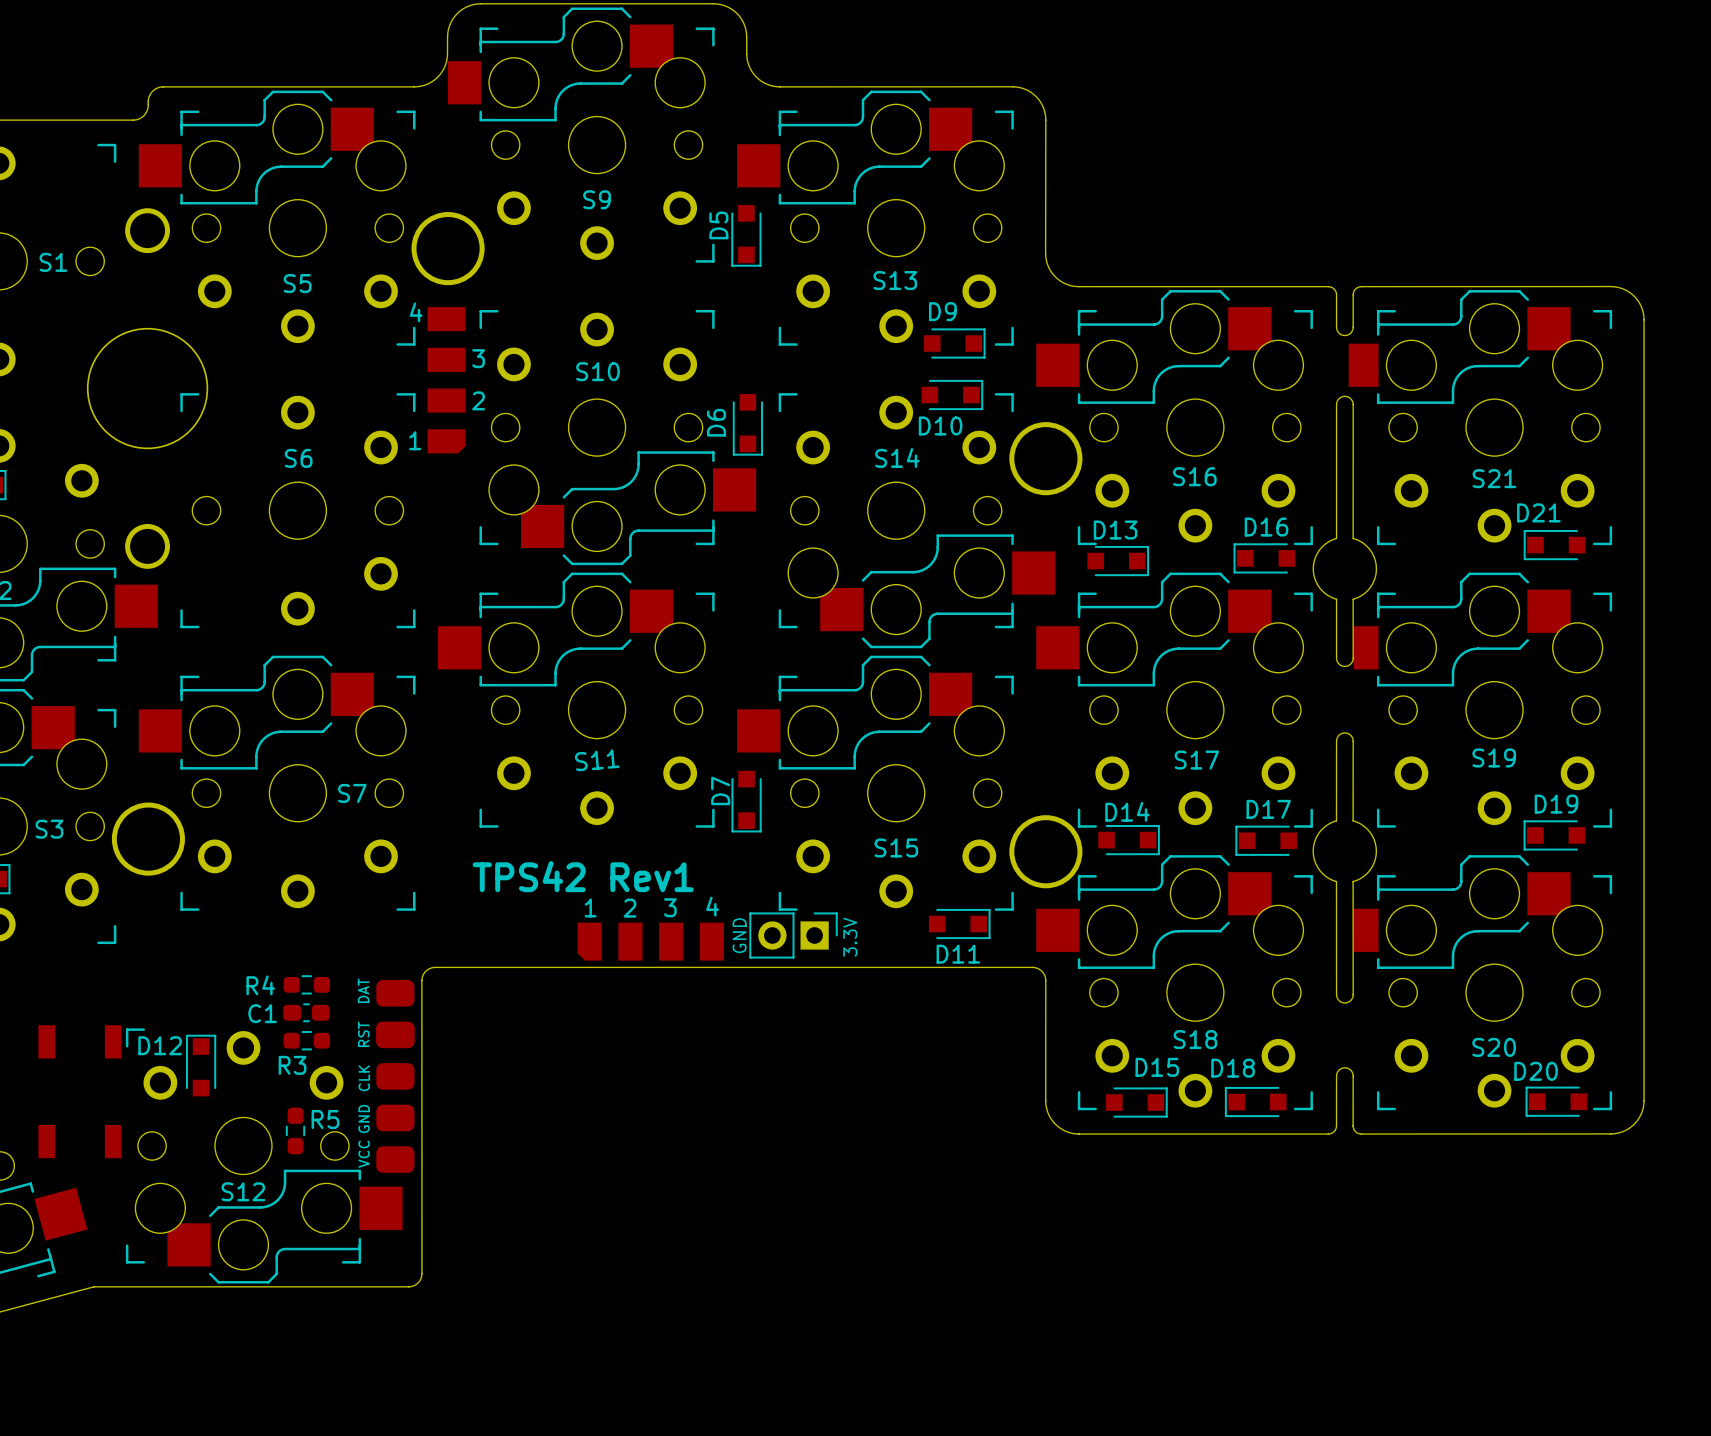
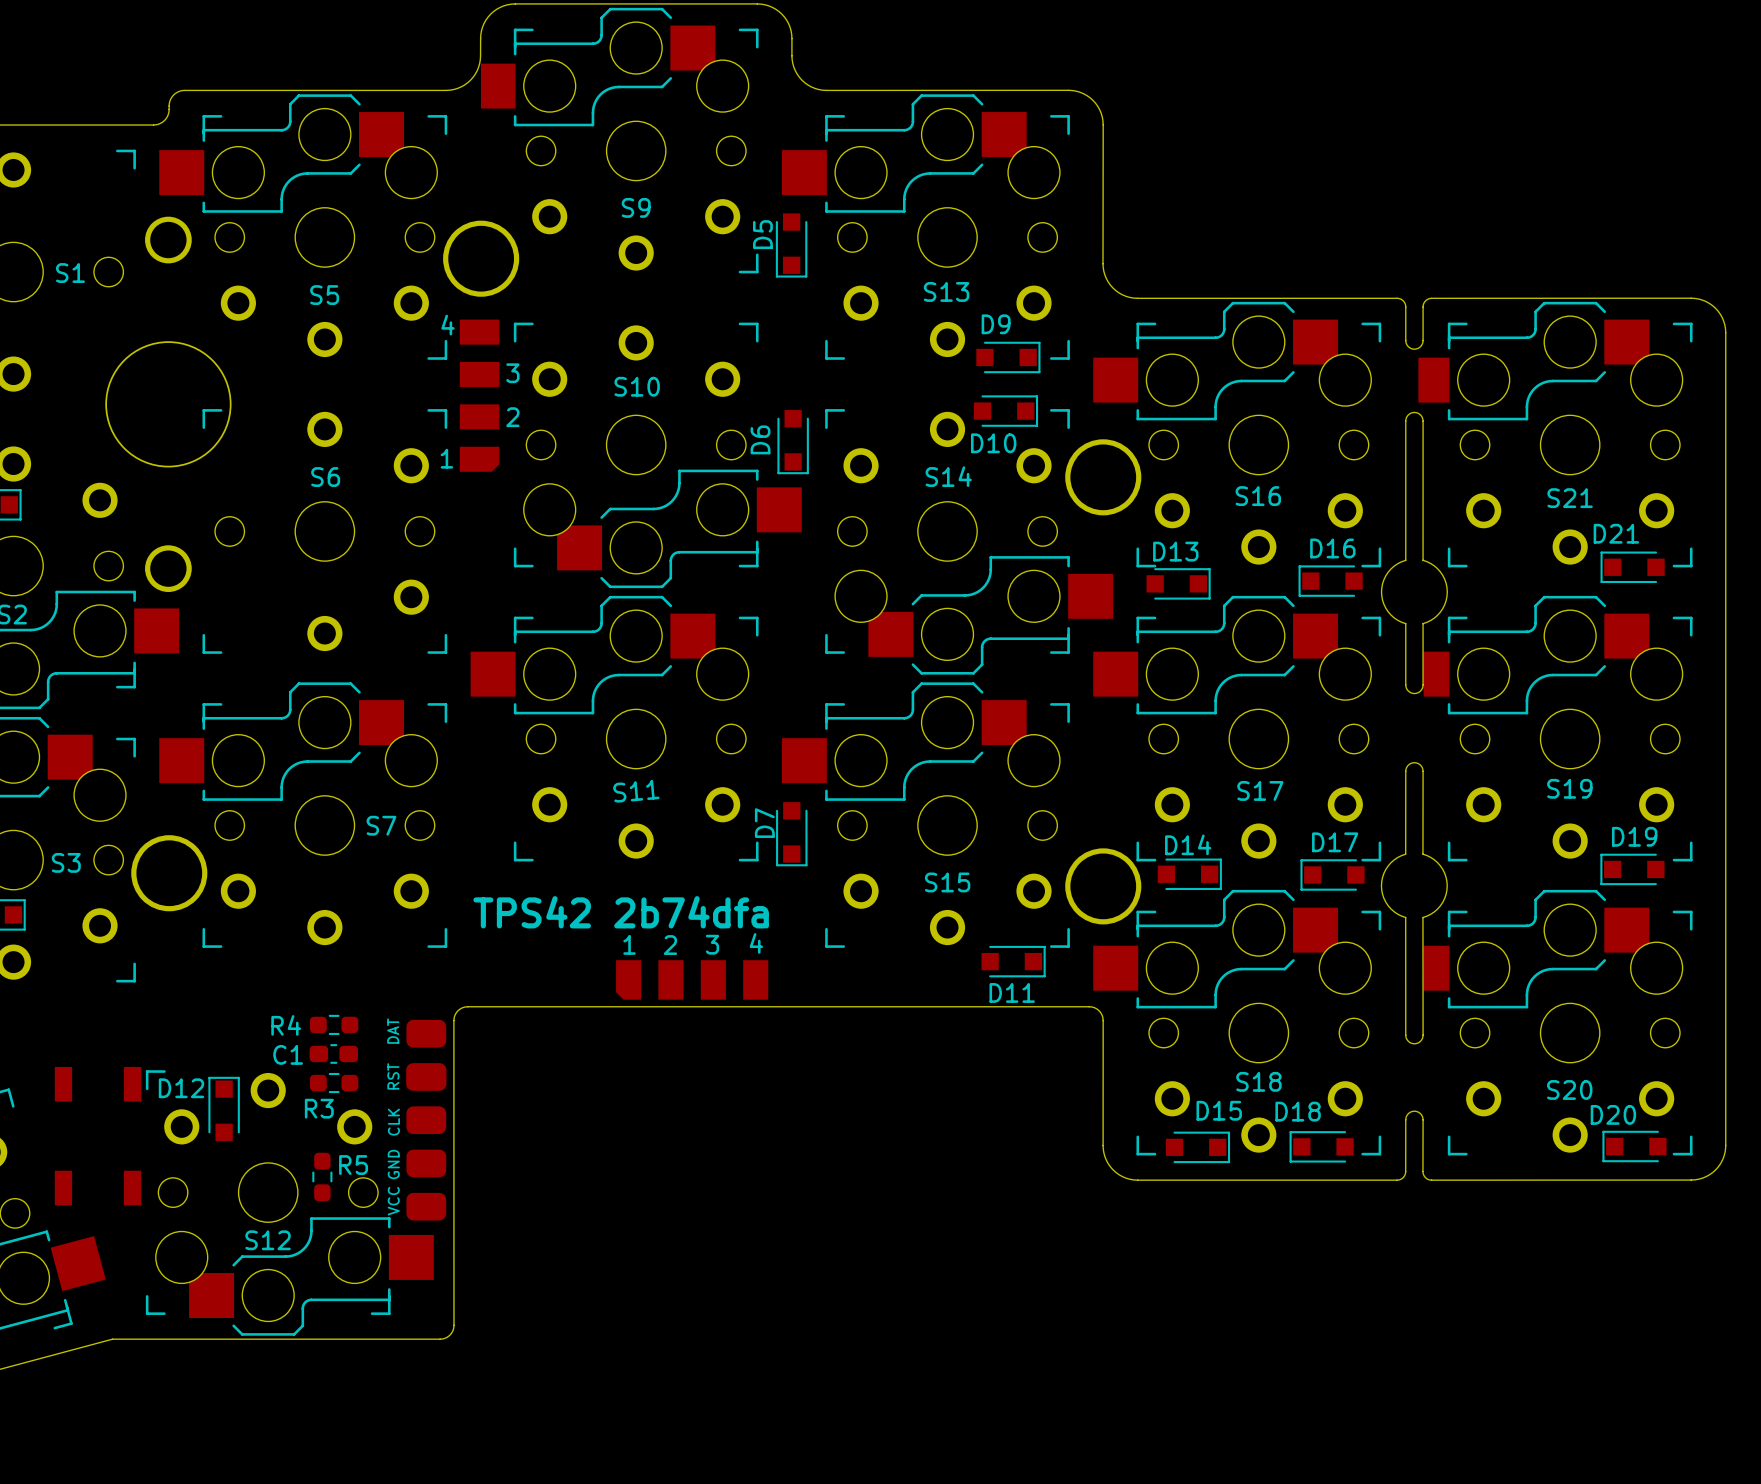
text: TPS42 Rev1 (583, 876) -> TPS42 2b74dfa (621, 912)
text: GND (739, 935) -> none
part: (793, 935) -> none
text: 3.3V (850, 937) -> none

